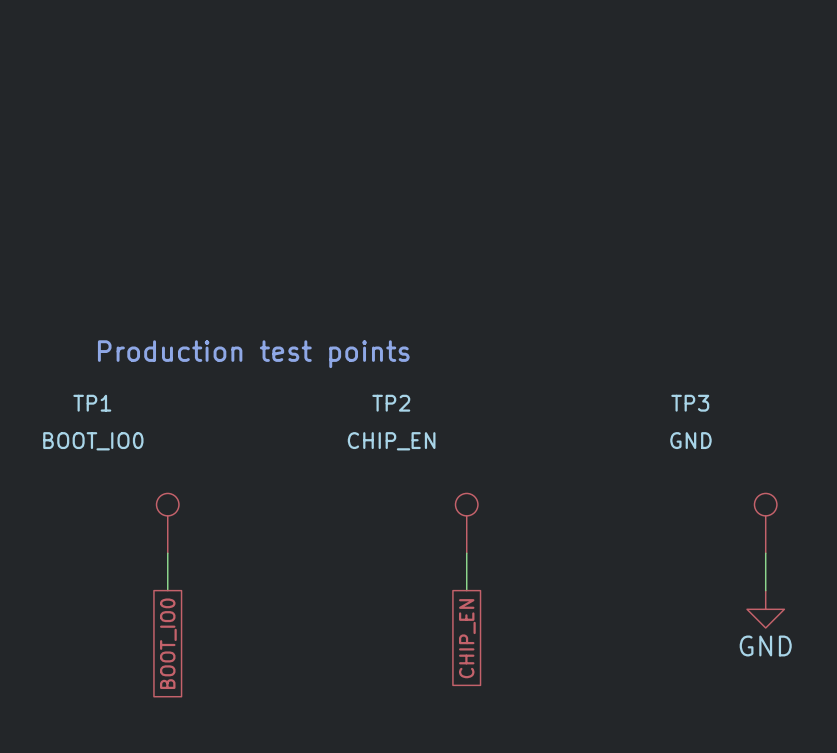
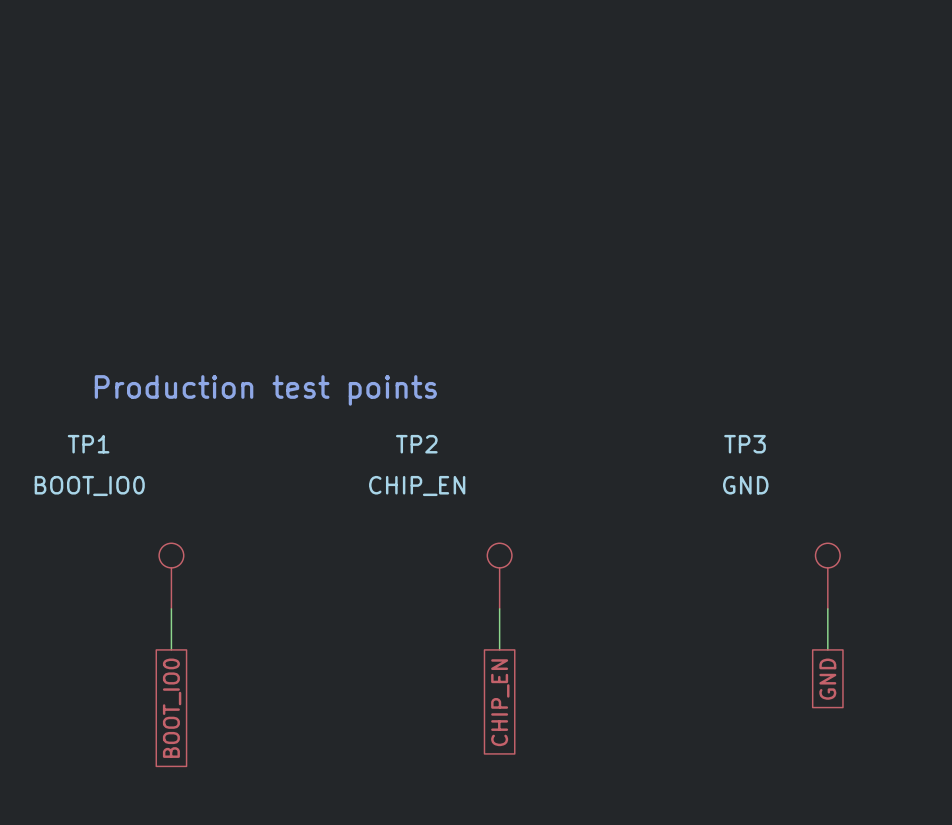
power symbol: GND (765, 609) -> none
global label: none -> GND (827, 679)

